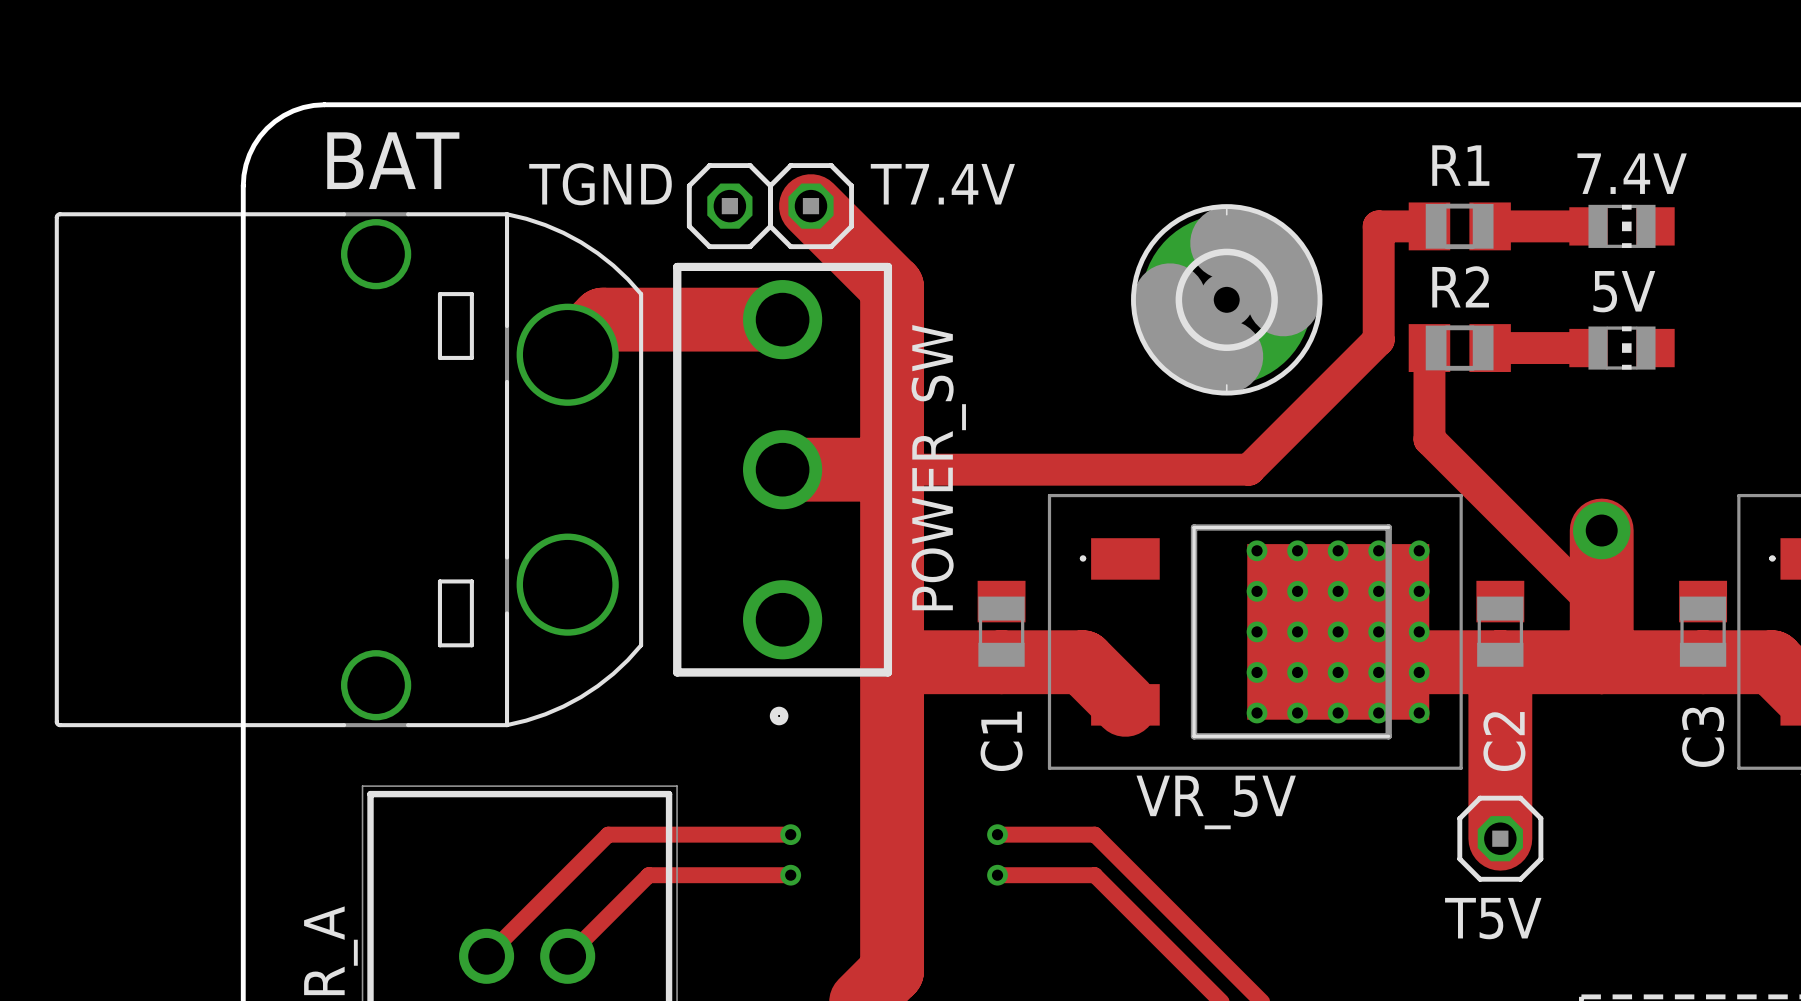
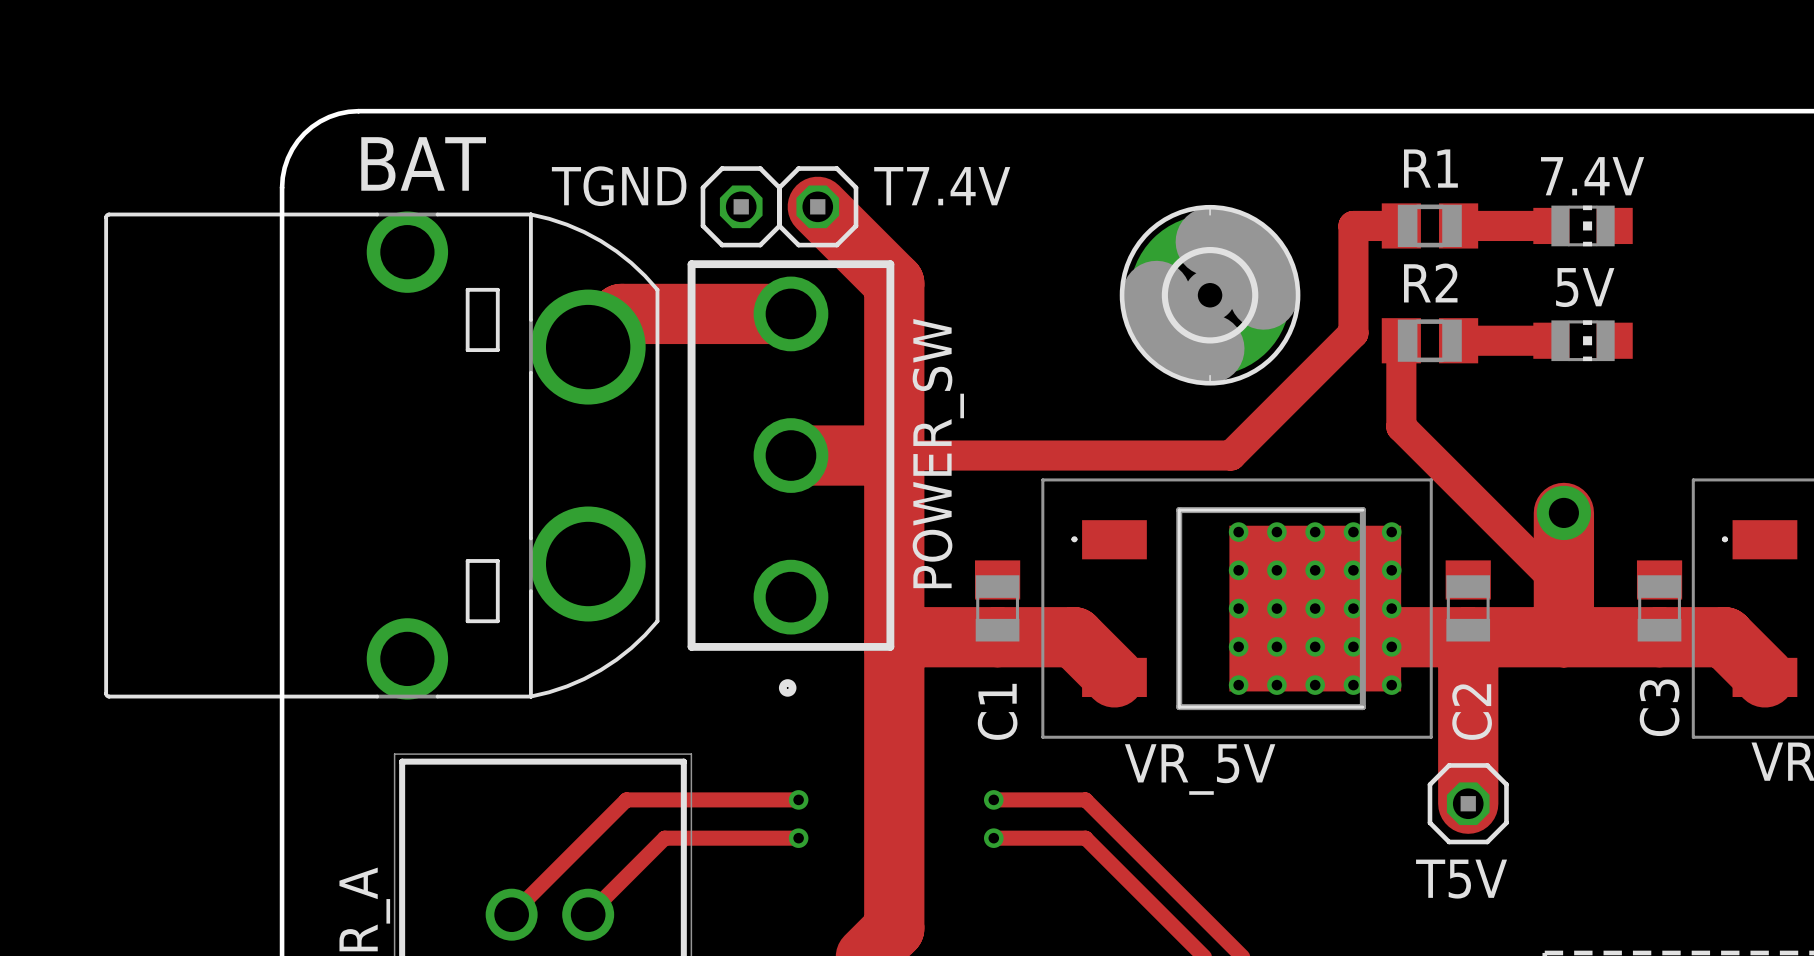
BAT footprint: [54, 212, 644, 728] -> [104, 211, 660, 700]

